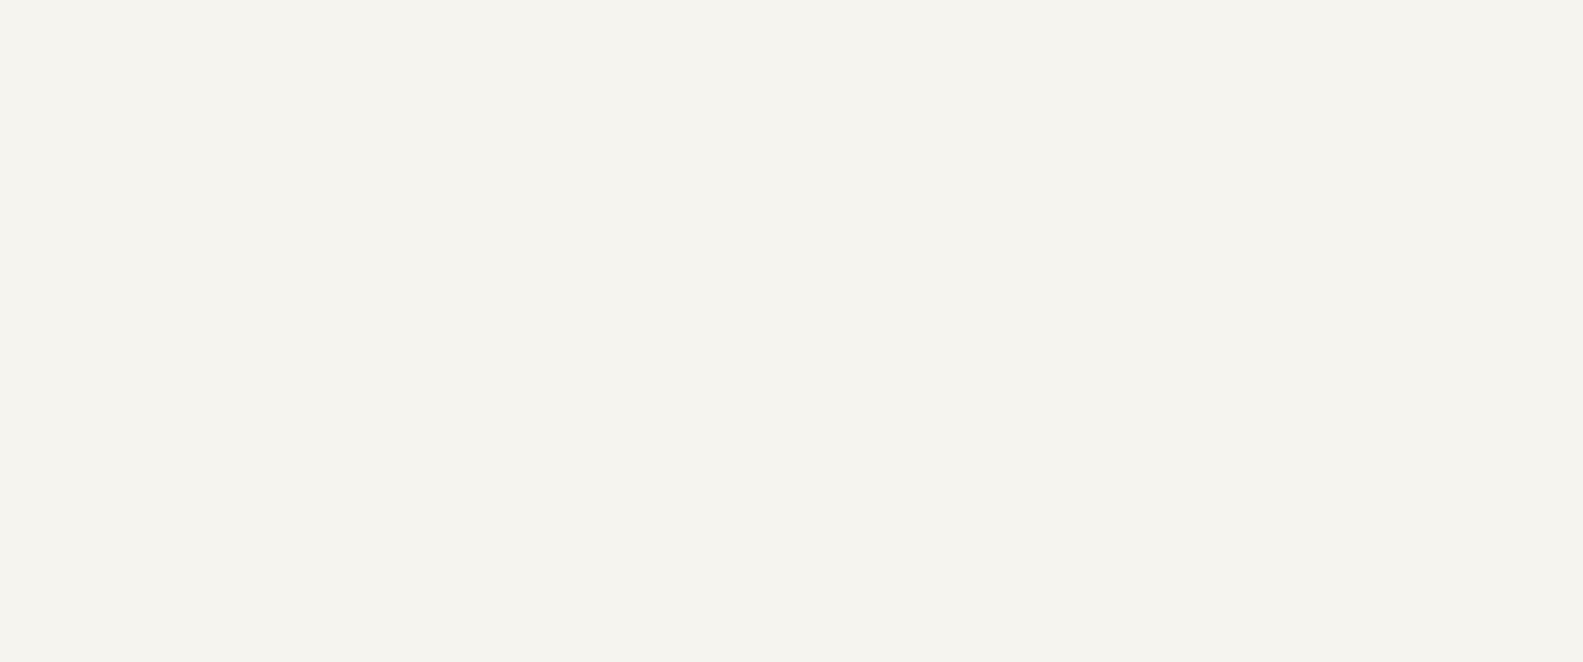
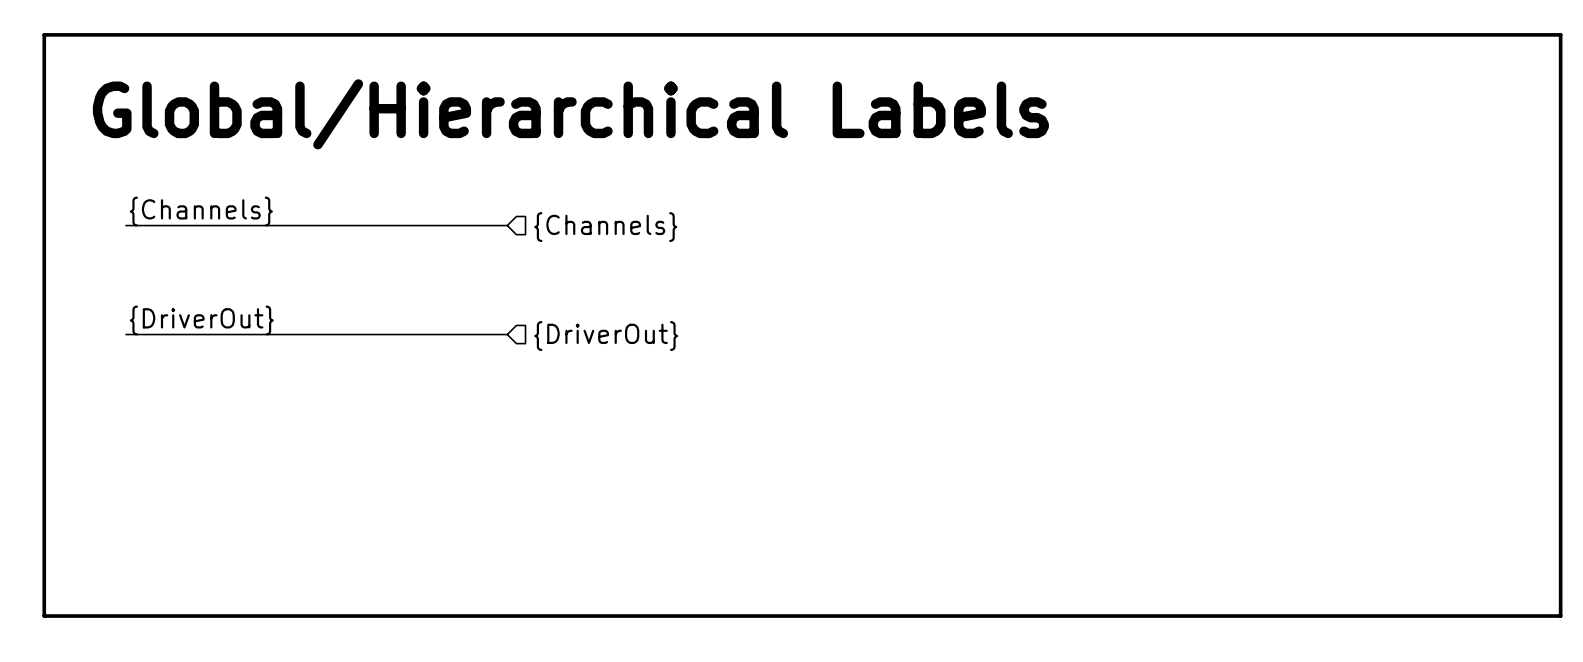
line: none -> (44, 34) (1560, 34) (1560, 616) (44, 616) (44, 34)
text: none -> Global/Hierarchical Labels (570, 114)
label: none -> {Channels} (201, 211)
bus: none -> (125, 225) (507, 225)
hierarchical label: none -> {Channels} (605, 227)
label: none -> {DriverOut} (201, 320)
bus: none -> (125, 334) (507, 334)
hierarchical label: none -> {DriverOut} (606, 336)

